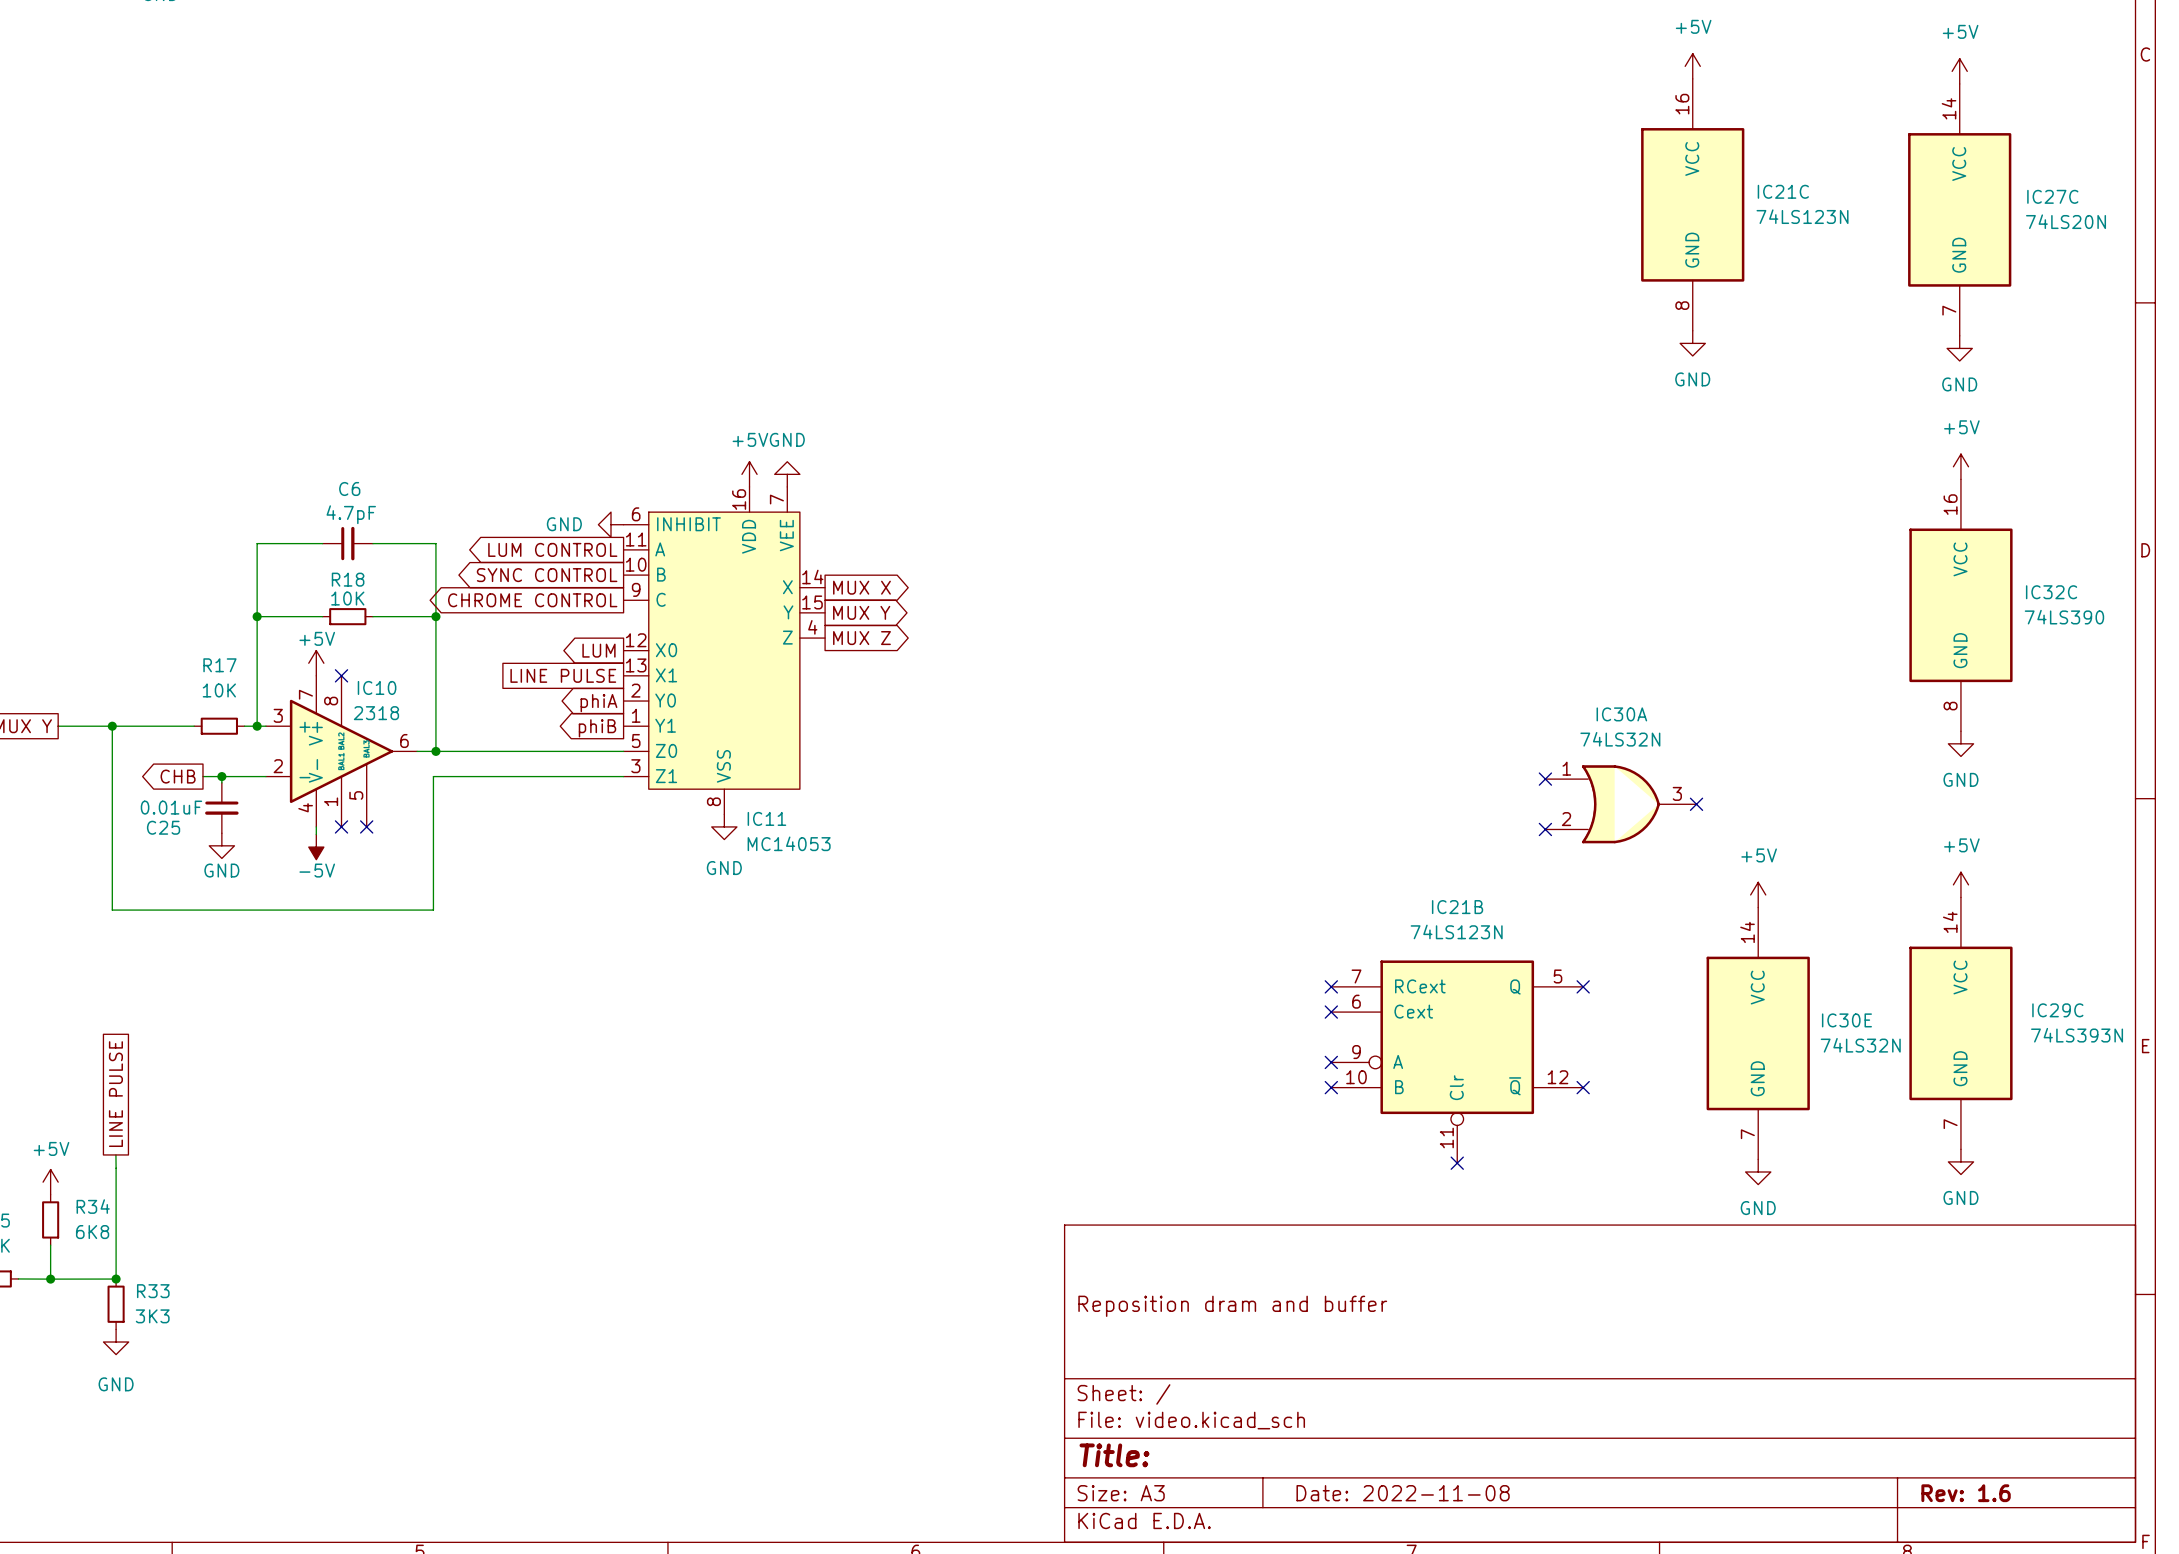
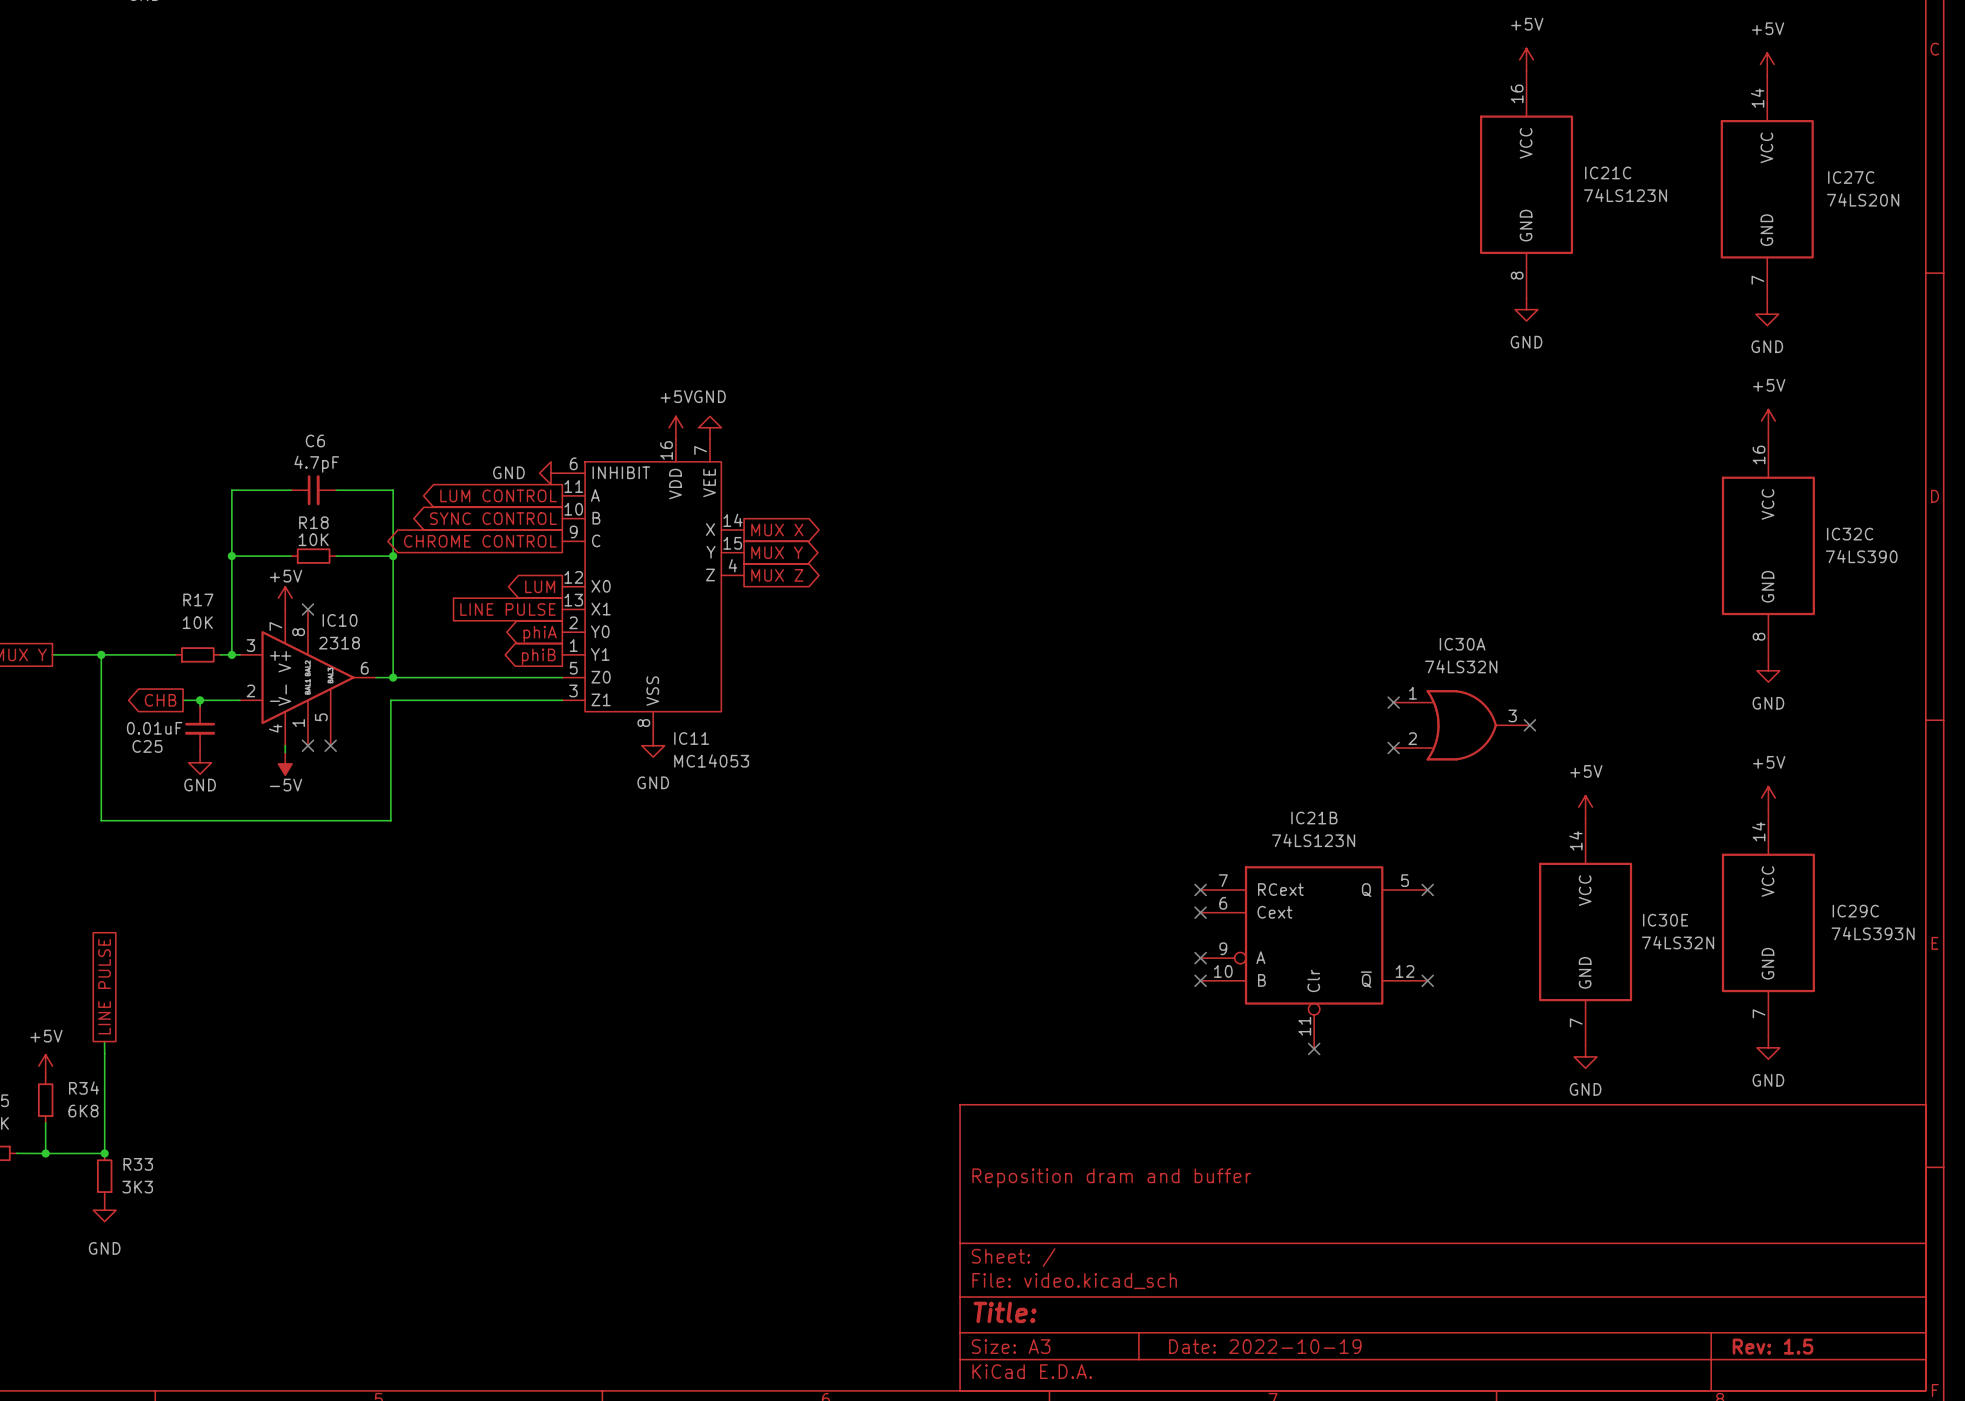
title block: Date: 2022-11-08 (1403, 1493) -> Date: 2022-10-19 (1265, 1346)
title block: Rev: 1.6 (1966, 1493) -> Rev: 1.5 (1773, 1346)

